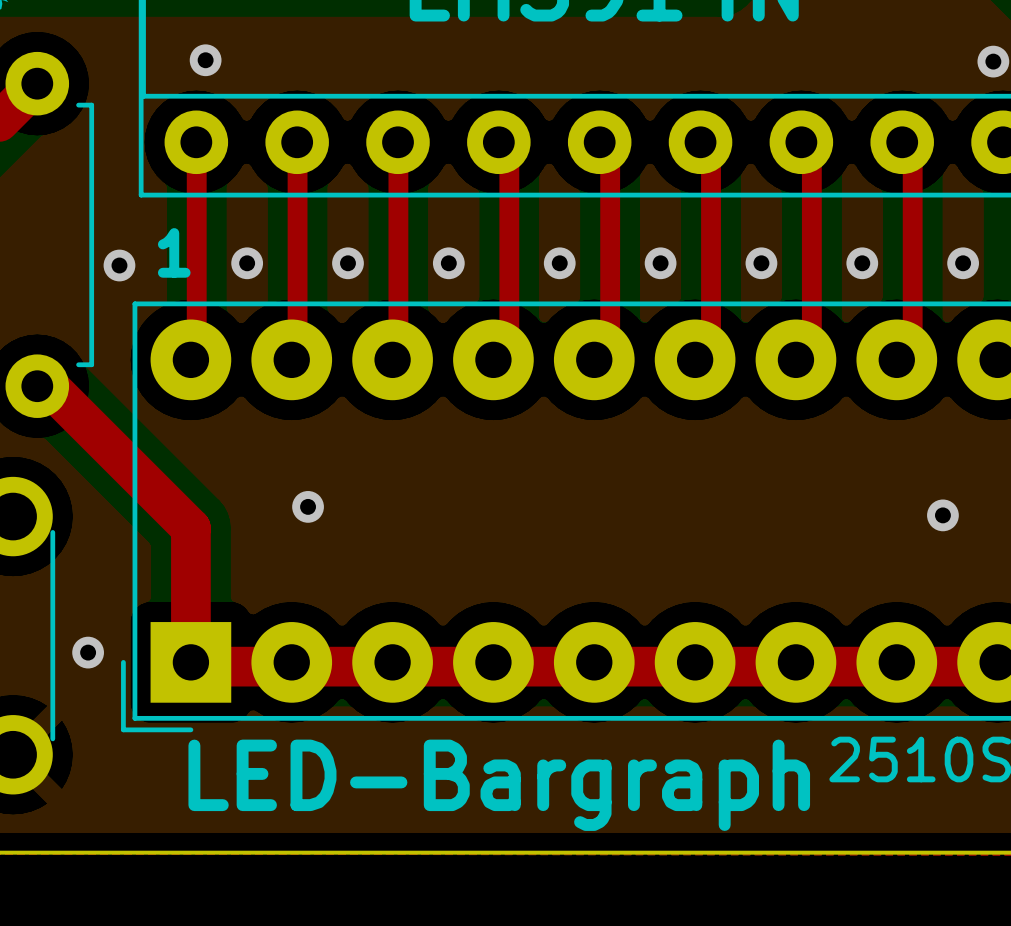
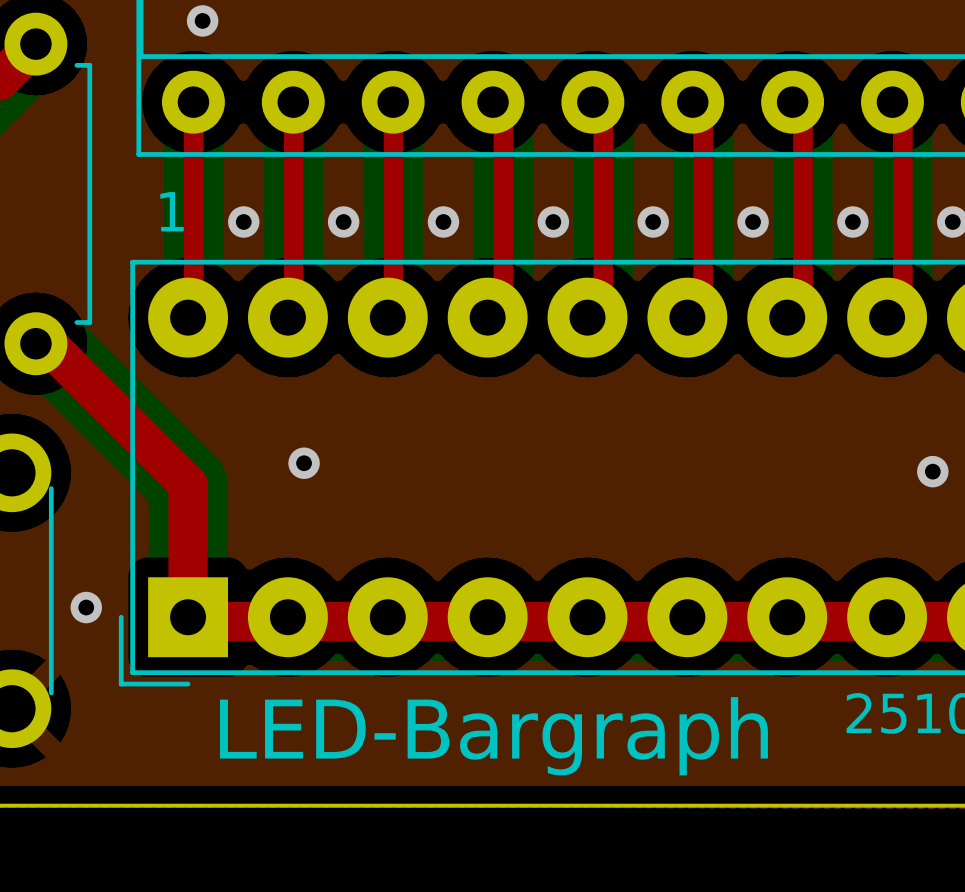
via: (119, 265) -> none

